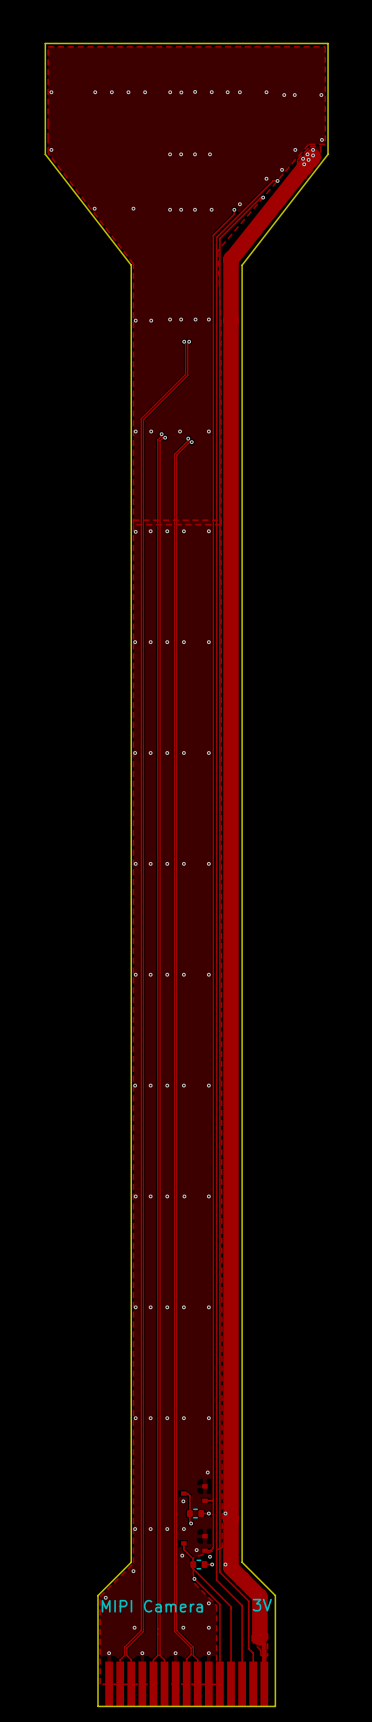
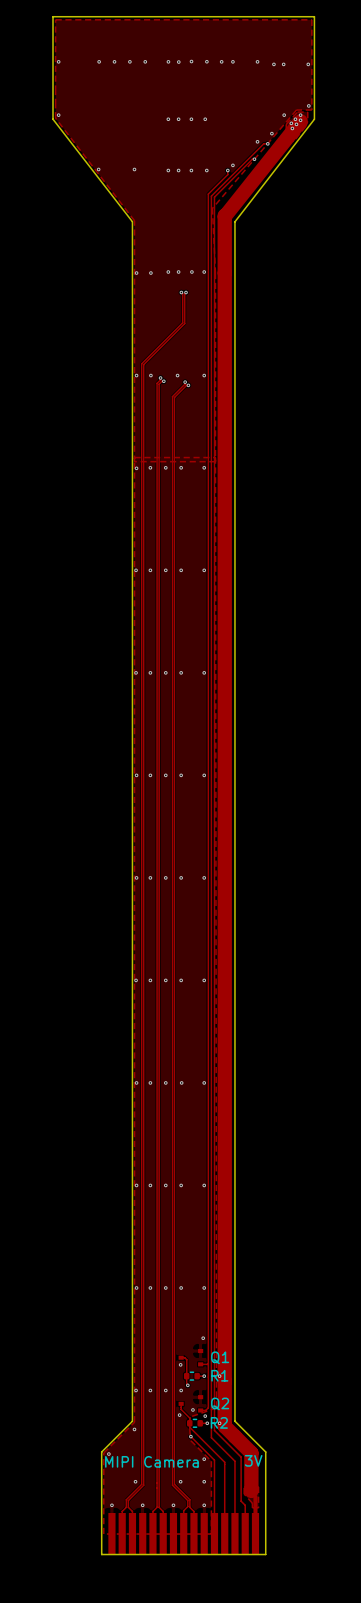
Q1 name: none -> Q1 (220, 1357)
R1 name: none -> R1 (219, 1375)
Q2 name: none -> Q2 (220, 1403)
R2 name: none -> R2 (219, 1422)

